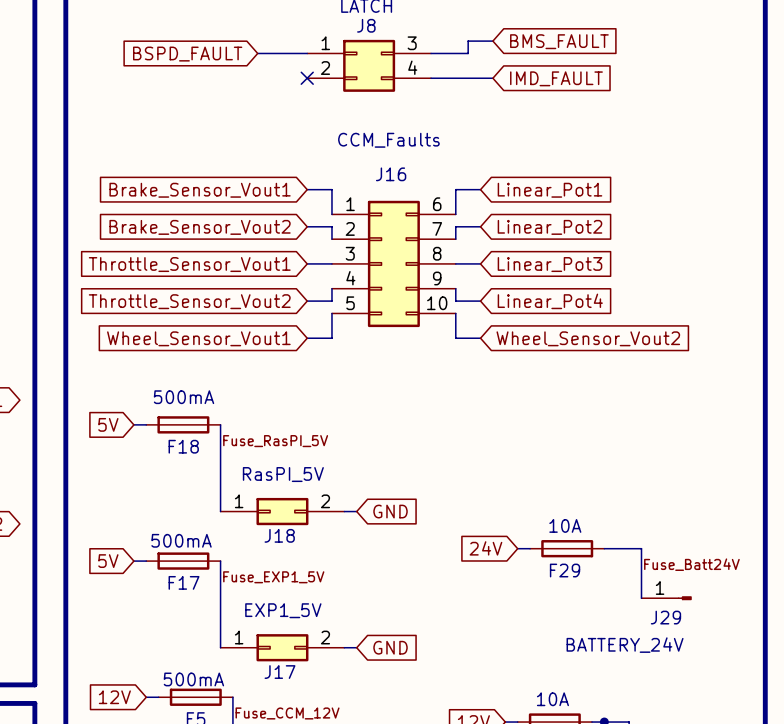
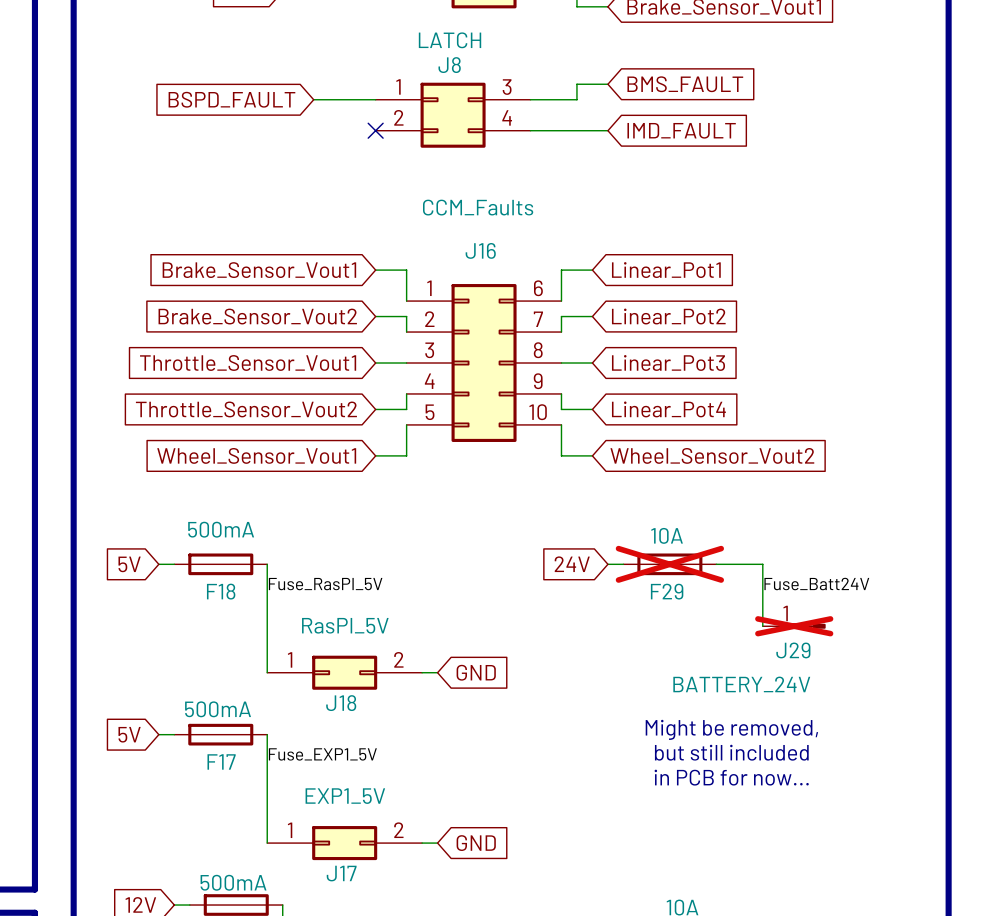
F29 do-not-place cross: none -> (669, 564)
J29 do-not-place cross: none -> (794, 626)
global label position: 24V (485, 548) -> 24V (572, 564)
wire: (517, 548) (530, 548) -> (607, 564) (623, 564)
F29 position: (567, 548) -> (669, 564)
wire: (604, 548) (641, 548) (641, 598) -> (716, 564) (762, 564) (762, 626)
text: none -> Might be removed, (731, 729)
label position: Fuse_Batt24V (691, 564) -> Fuse_Batt24V (816, 584)
text: none -> but still included (731, 752)
text: none -> in PCB for now... (731, 777)
J29 position: (666, 598) -> (794, 626)

